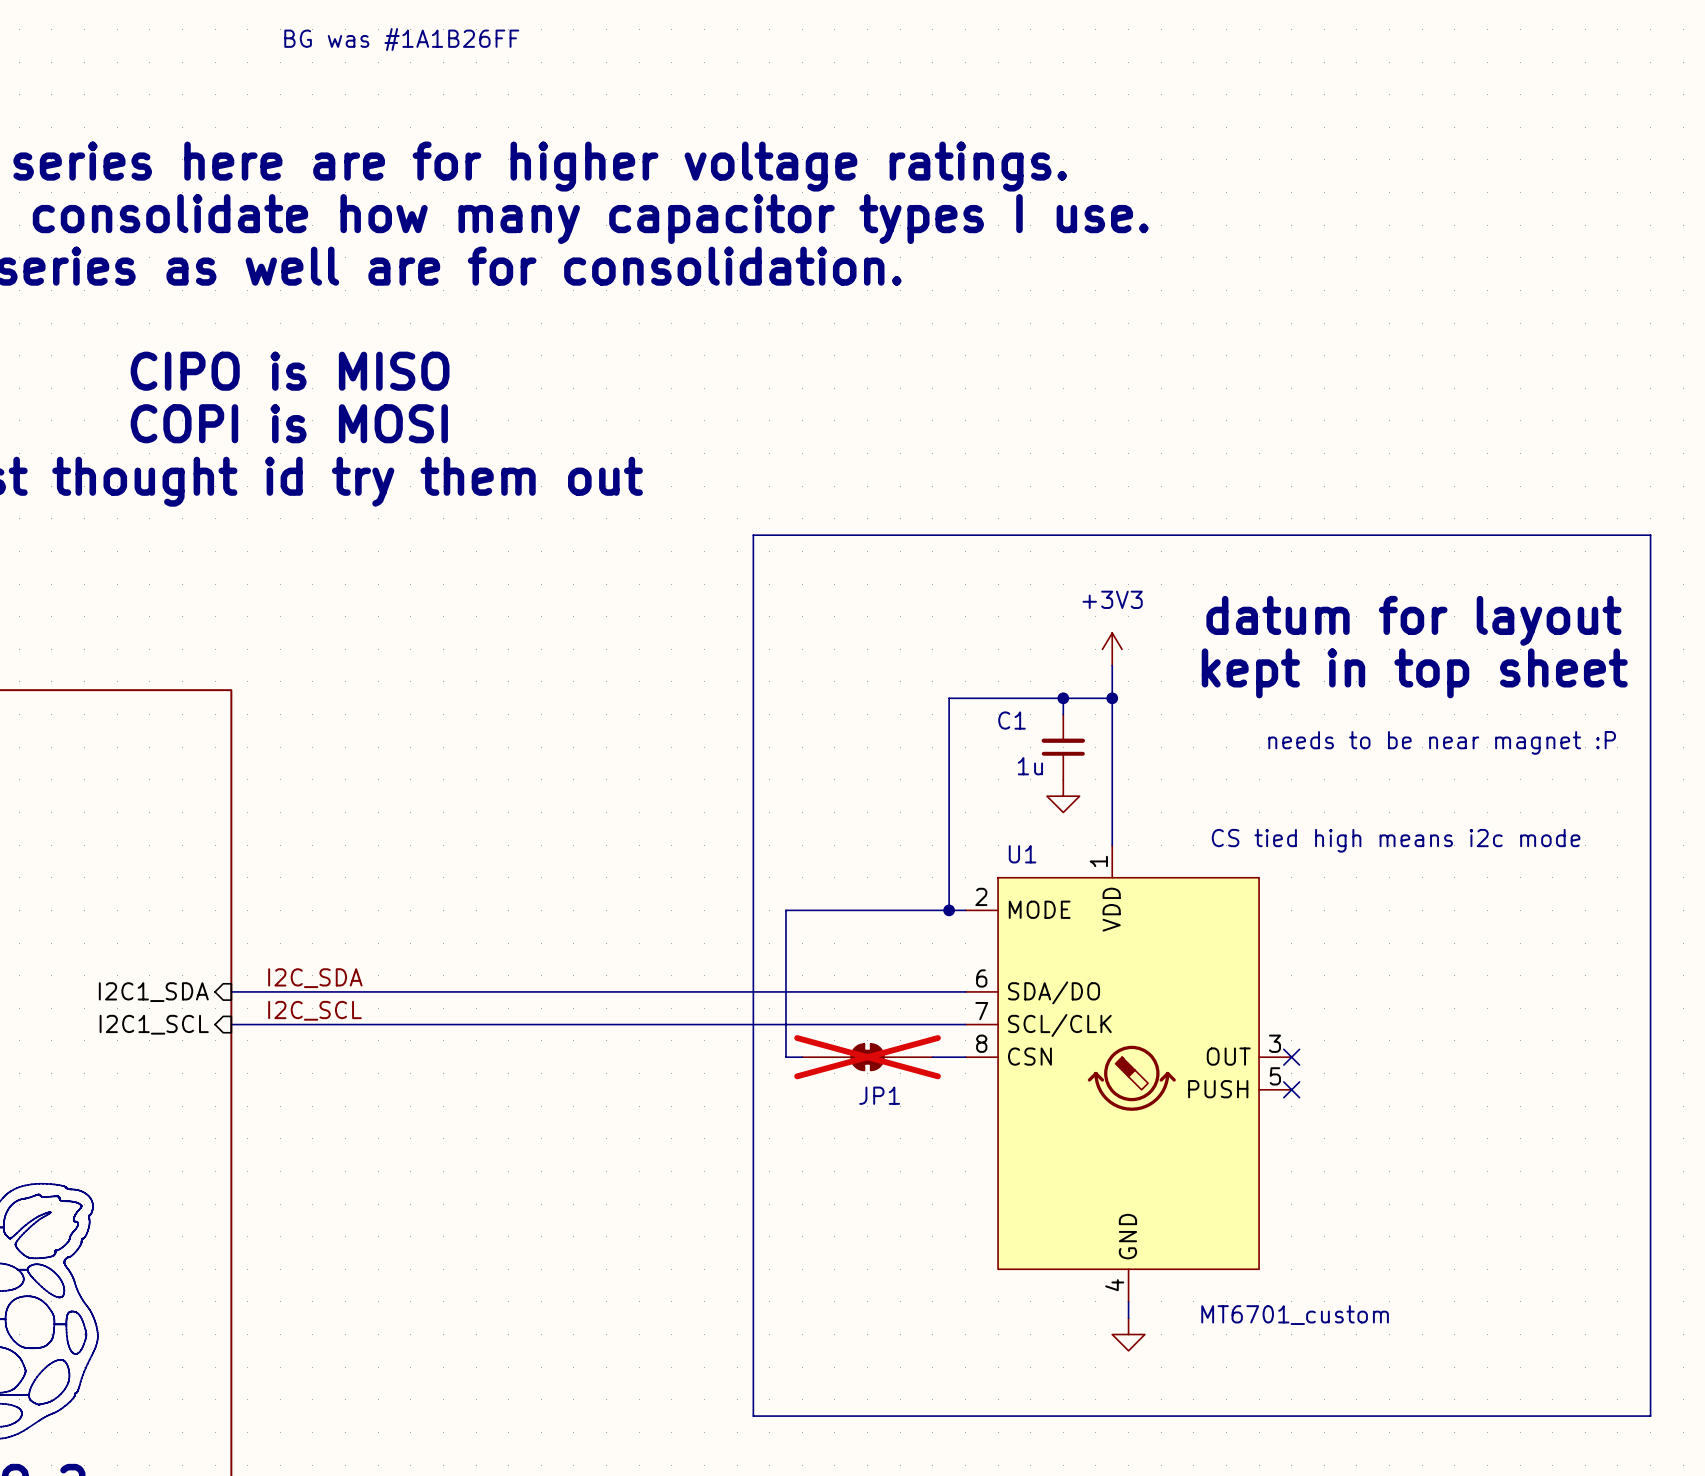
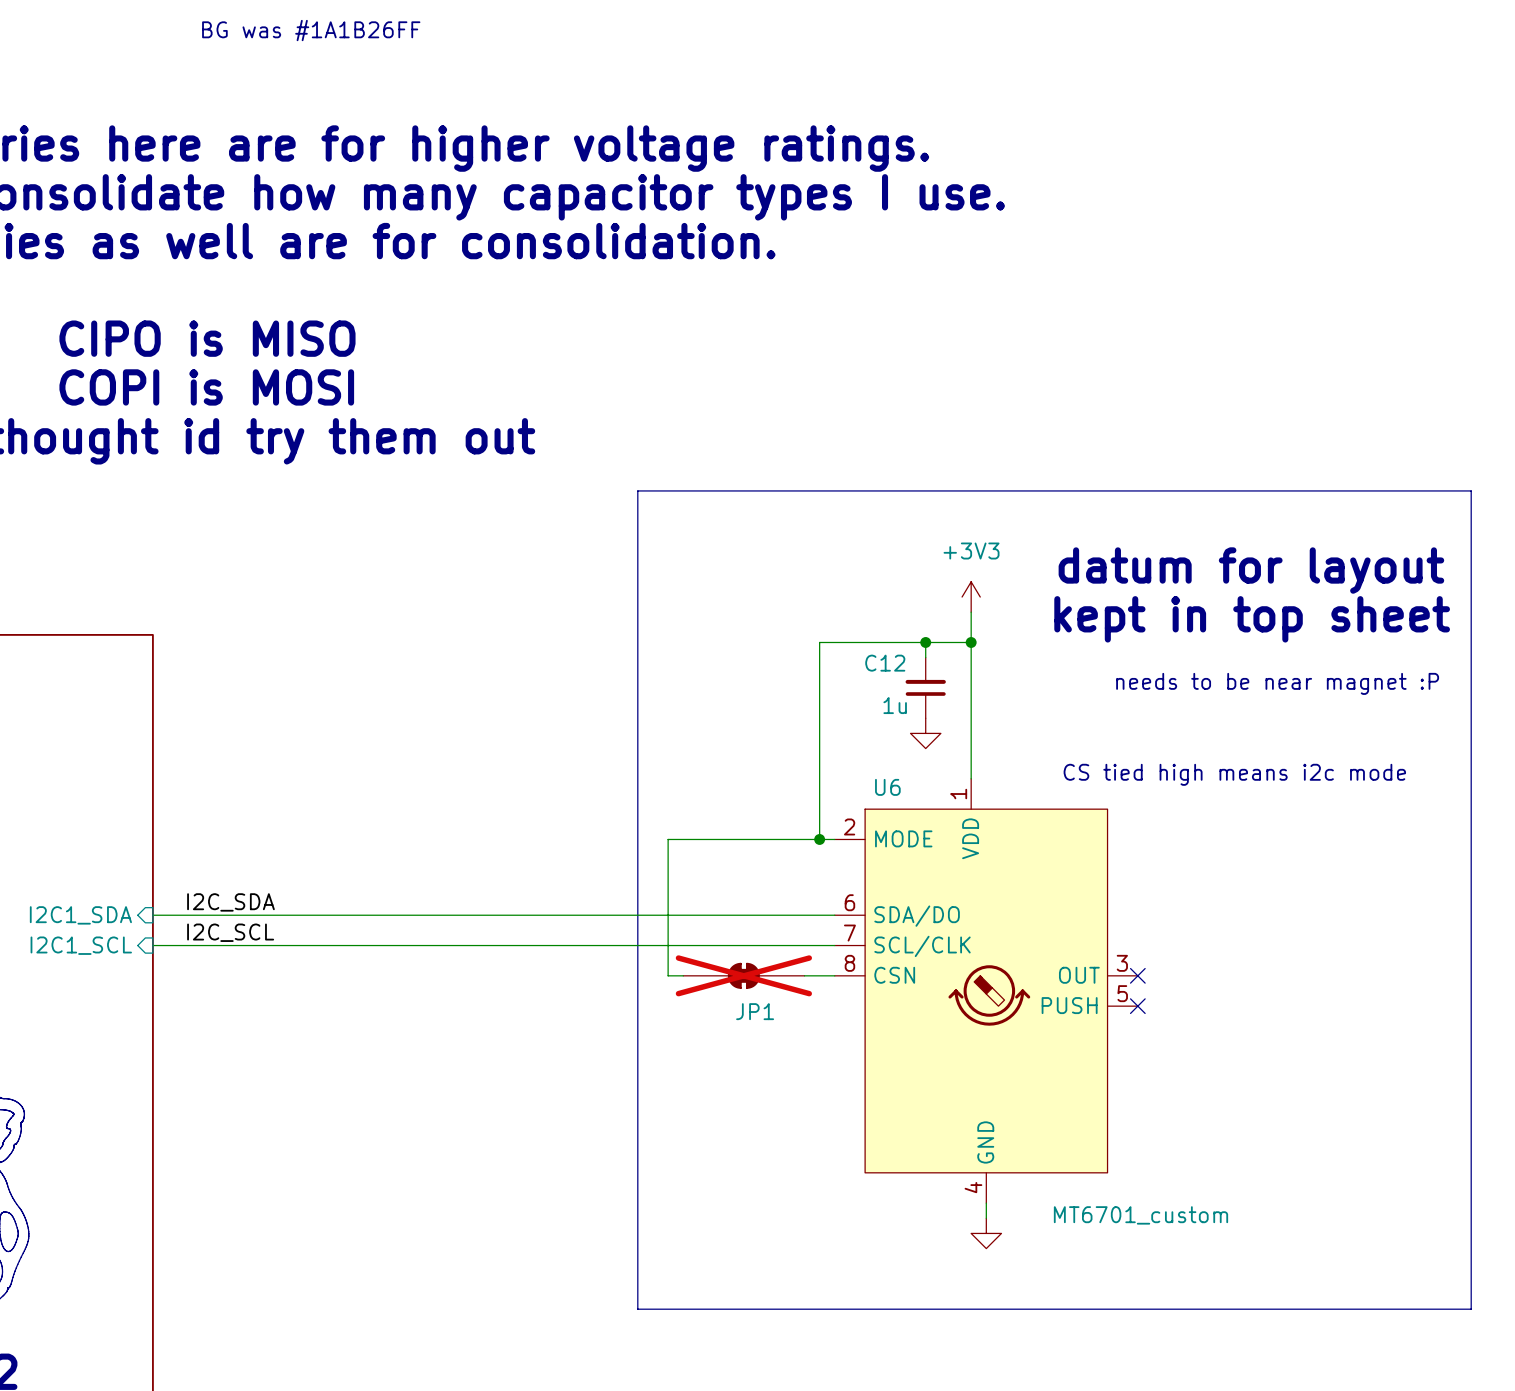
C1 name: C1 (1012, 720) -> C12 (885, 663)
U1 name: U1 (1022, 854) -> U6 (887, 787)

